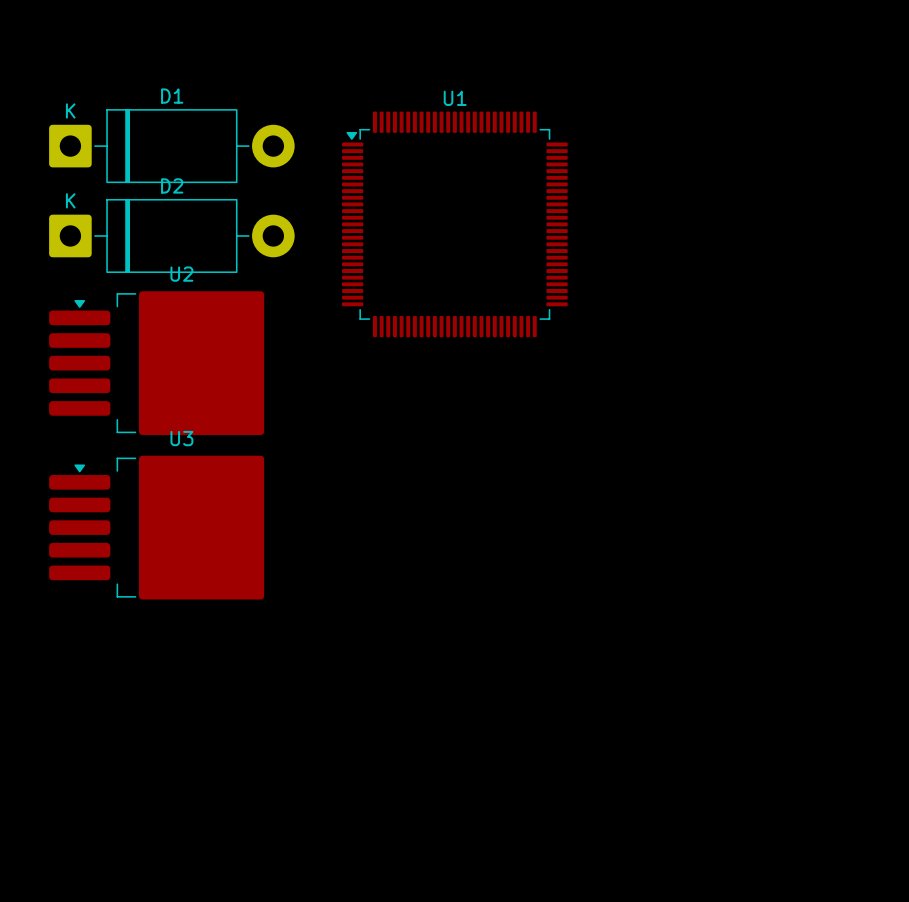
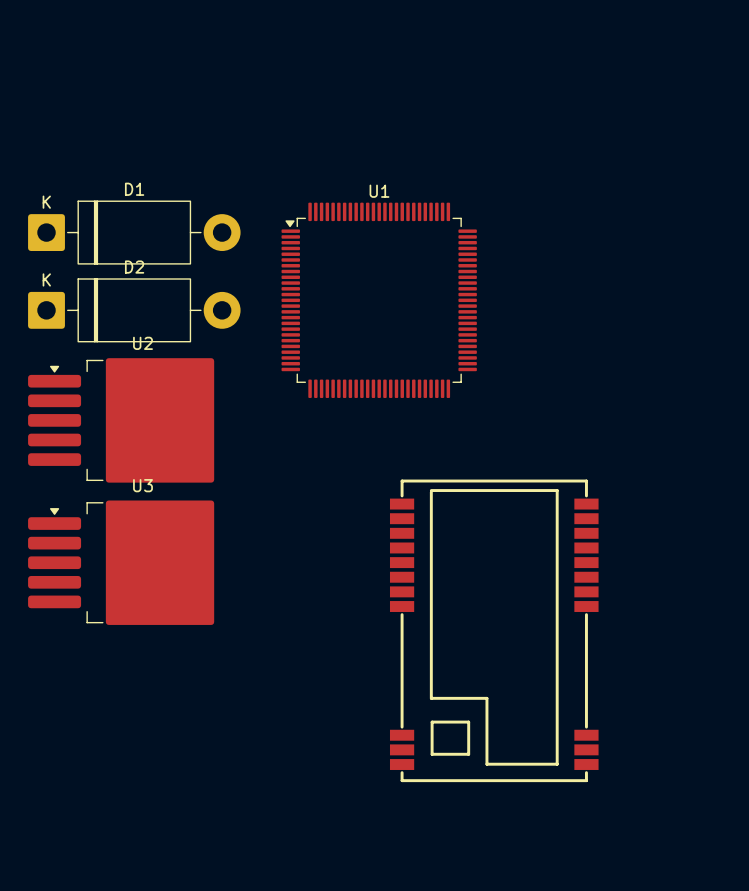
part: none -> (494, 630)

